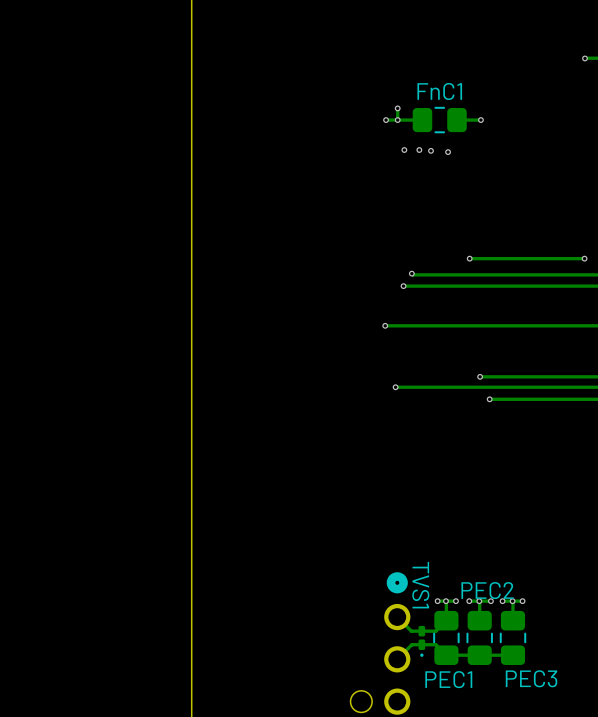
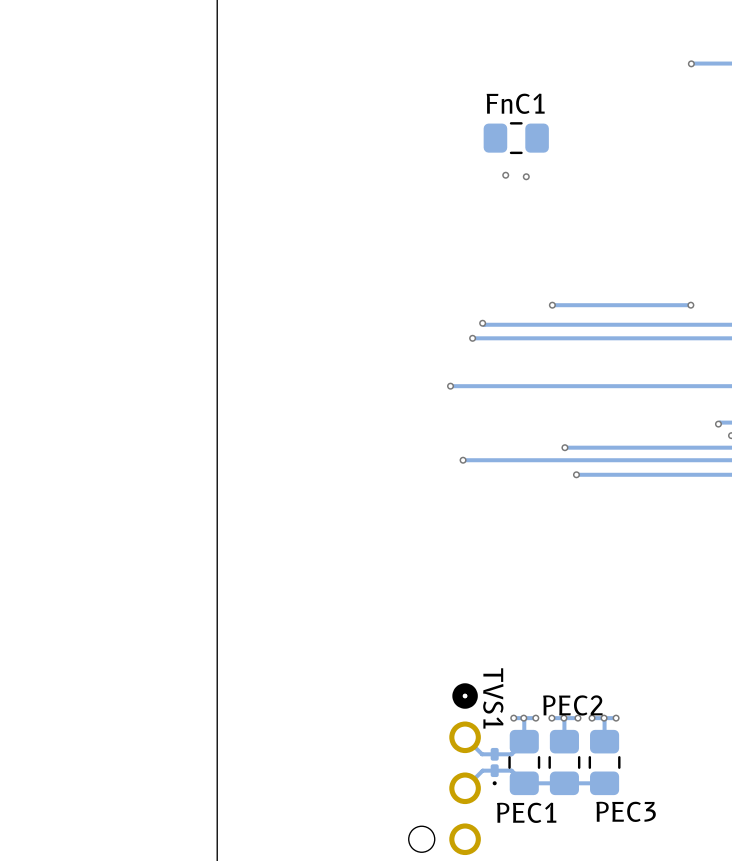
track: (397, 108) (397, 120) -> none
via: (397, 108) -> none
via: (386, 120) -> none
via: (397, 120) -> none
track: (422, 120) (386, 120) -> none
track: (480, 120) (457, 120) -> none
via: (480, 120) -> none
via: (404, 150) -> none
via: (419, 150) -> none

